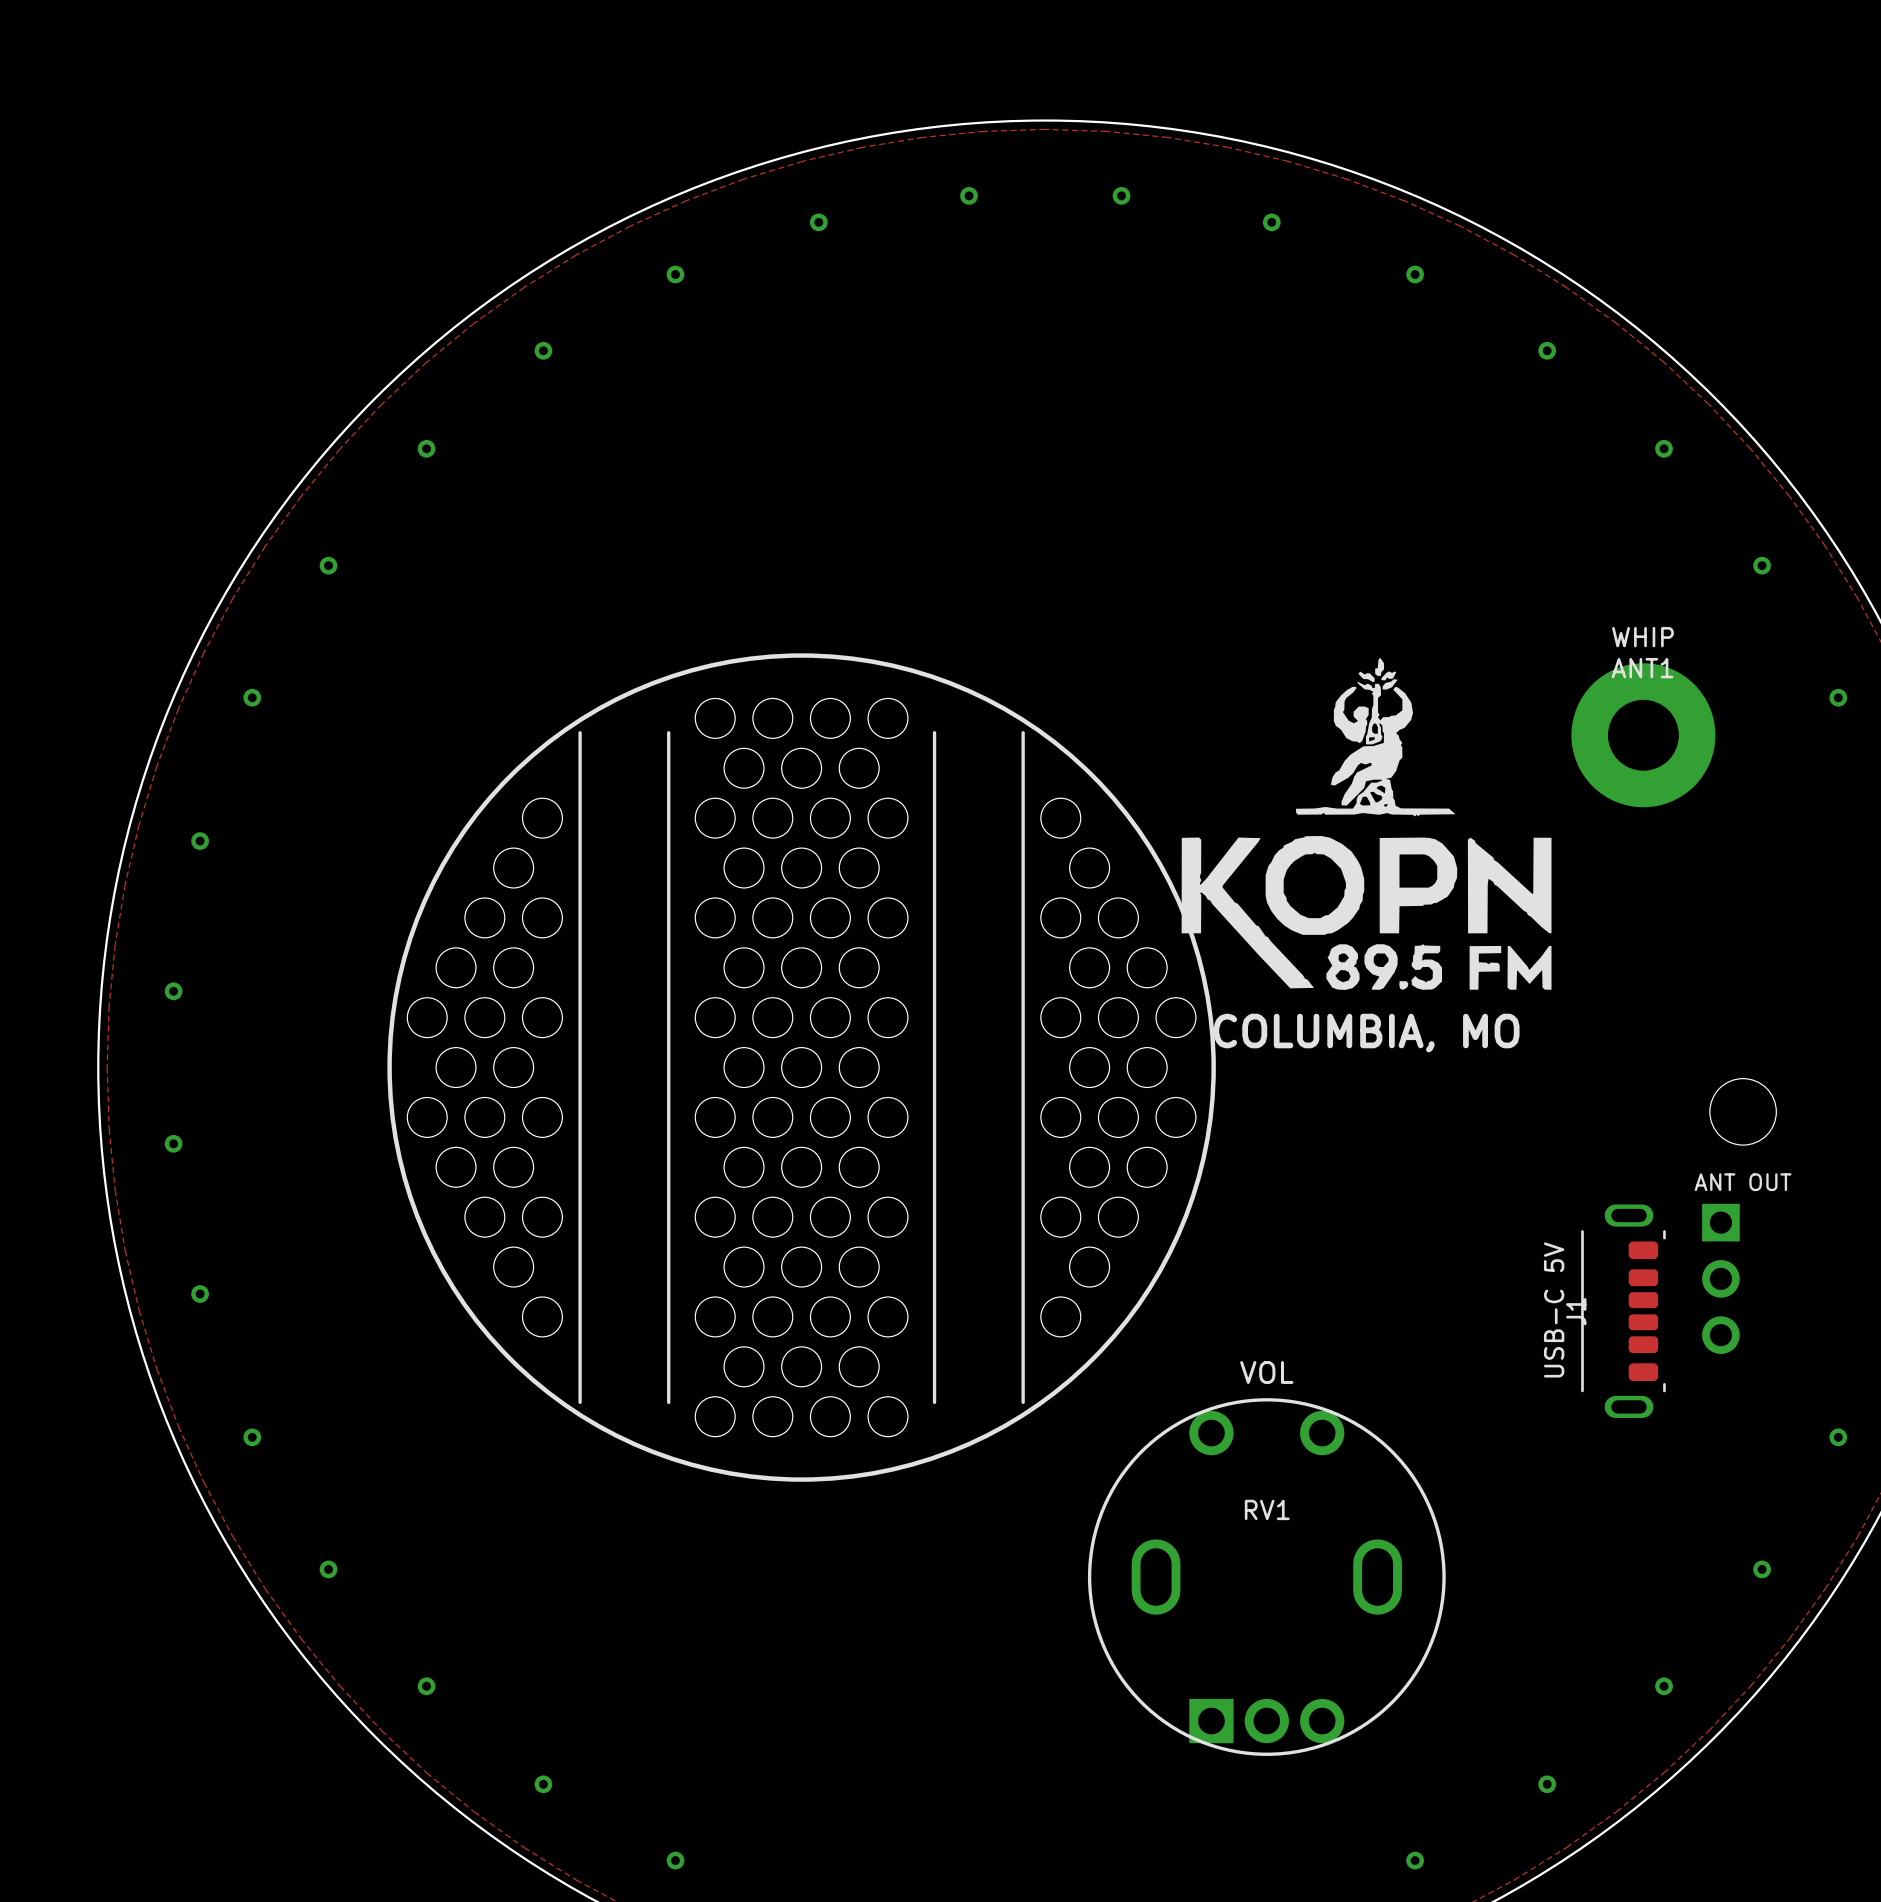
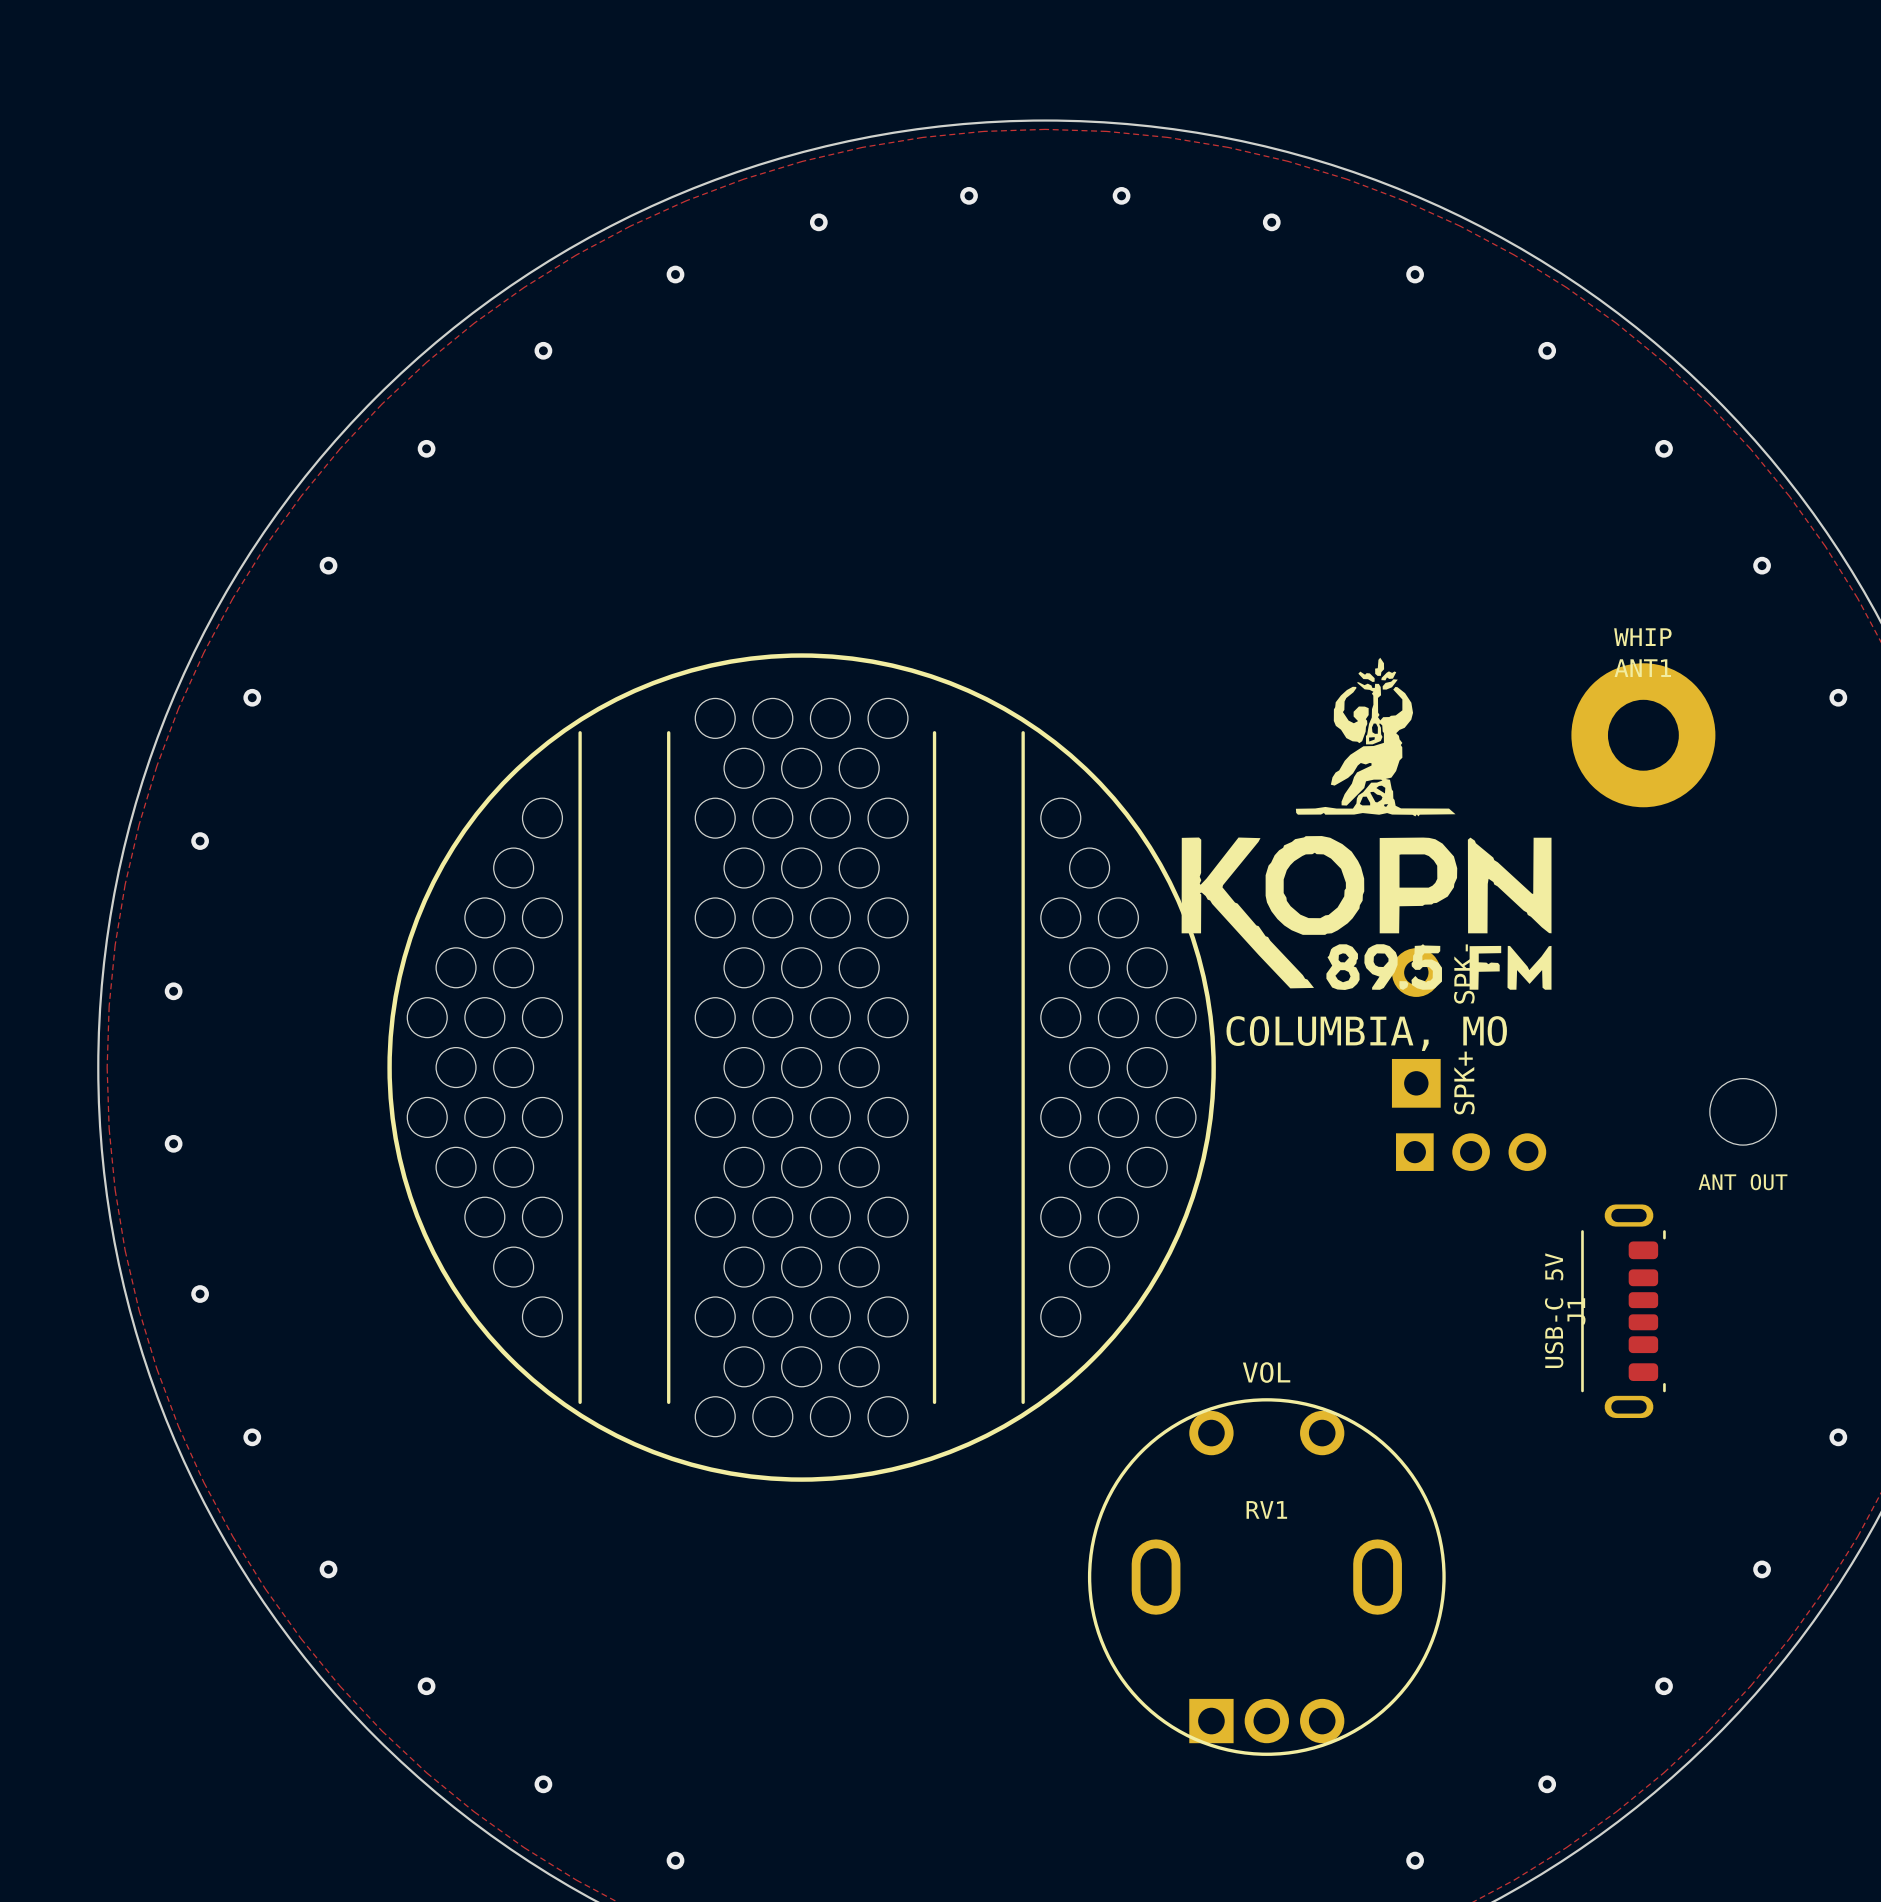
part: none -> (1416, 1027)
part rotation: 0° (1720, 1278) -> 90° counterclockwise (1471, 1152)
part position: (1720, 1278) -> (1471, 1152)

